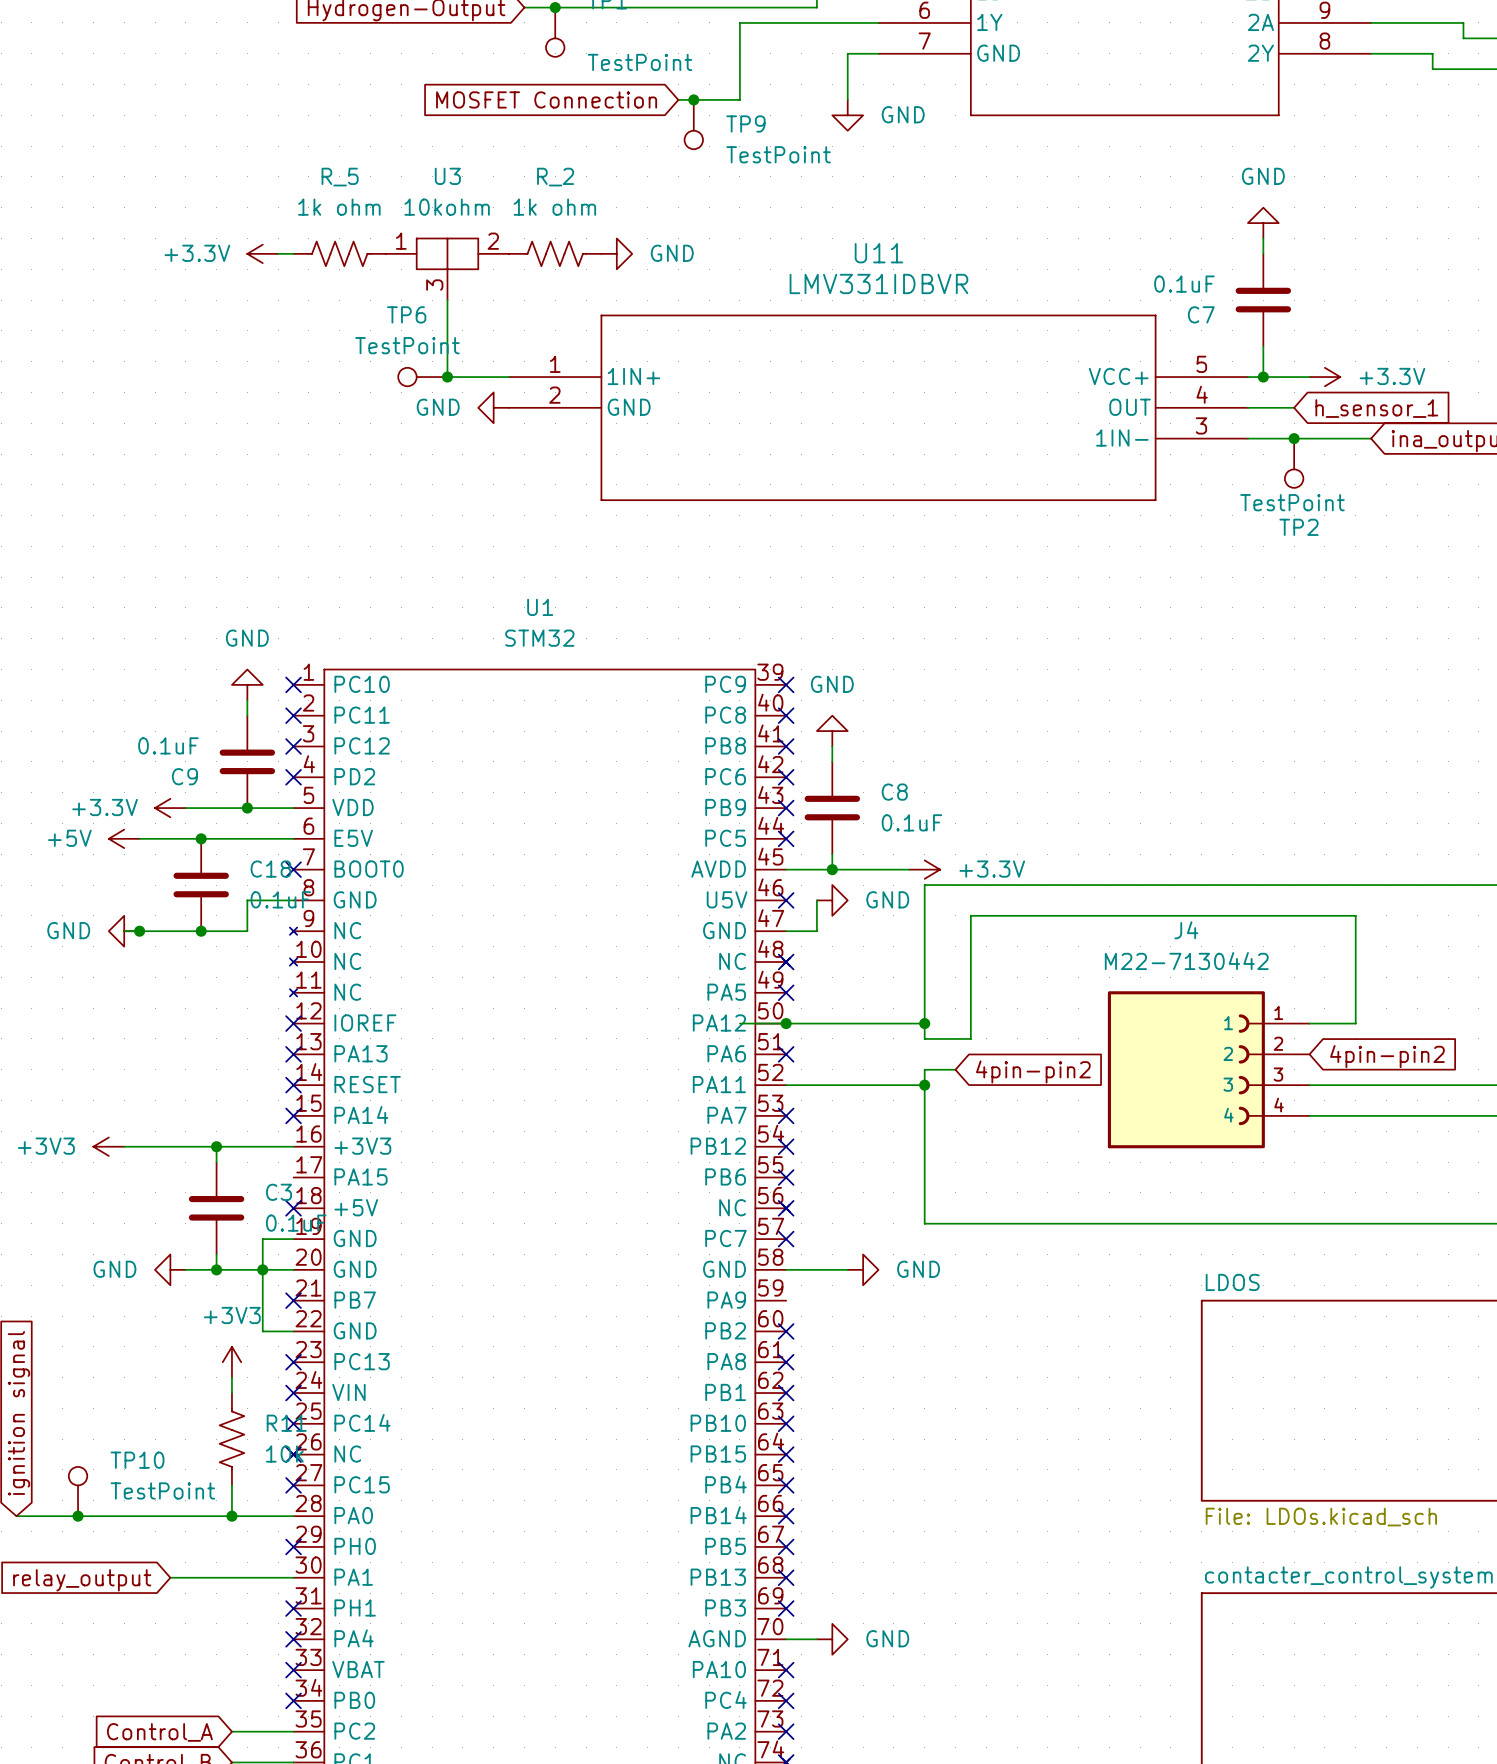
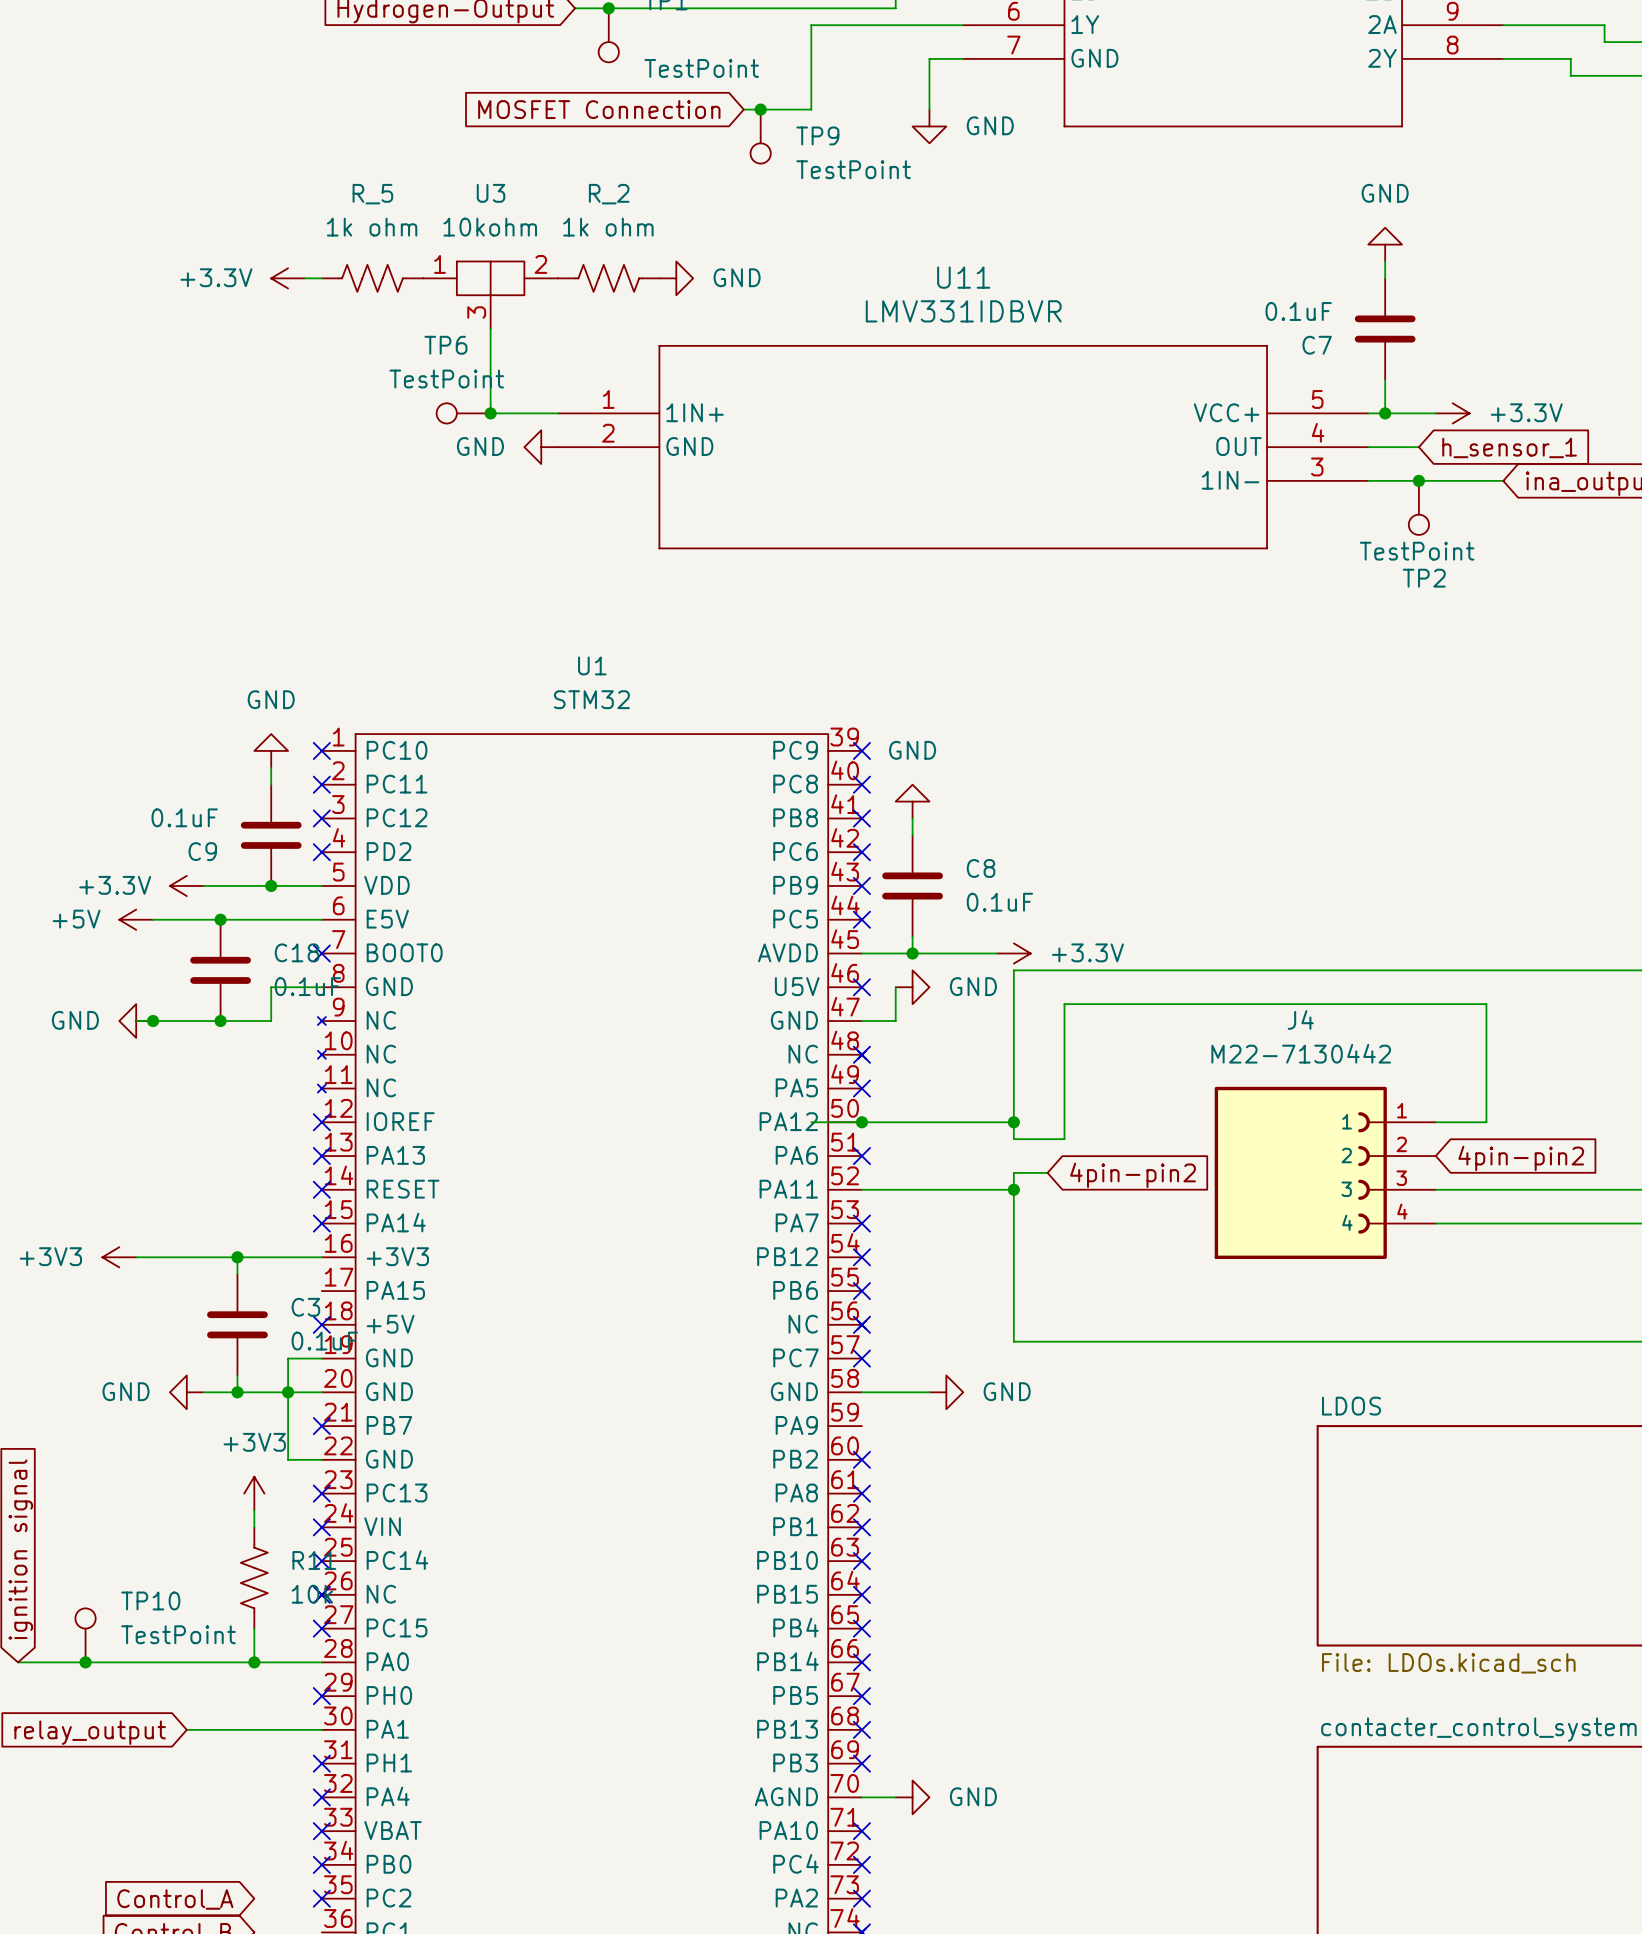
wire: (231, 1731) (293, 1731) -> none
no-connect mark: none -> (321, 1898)
wire: (231, 1762) (293, 1762) -> none

